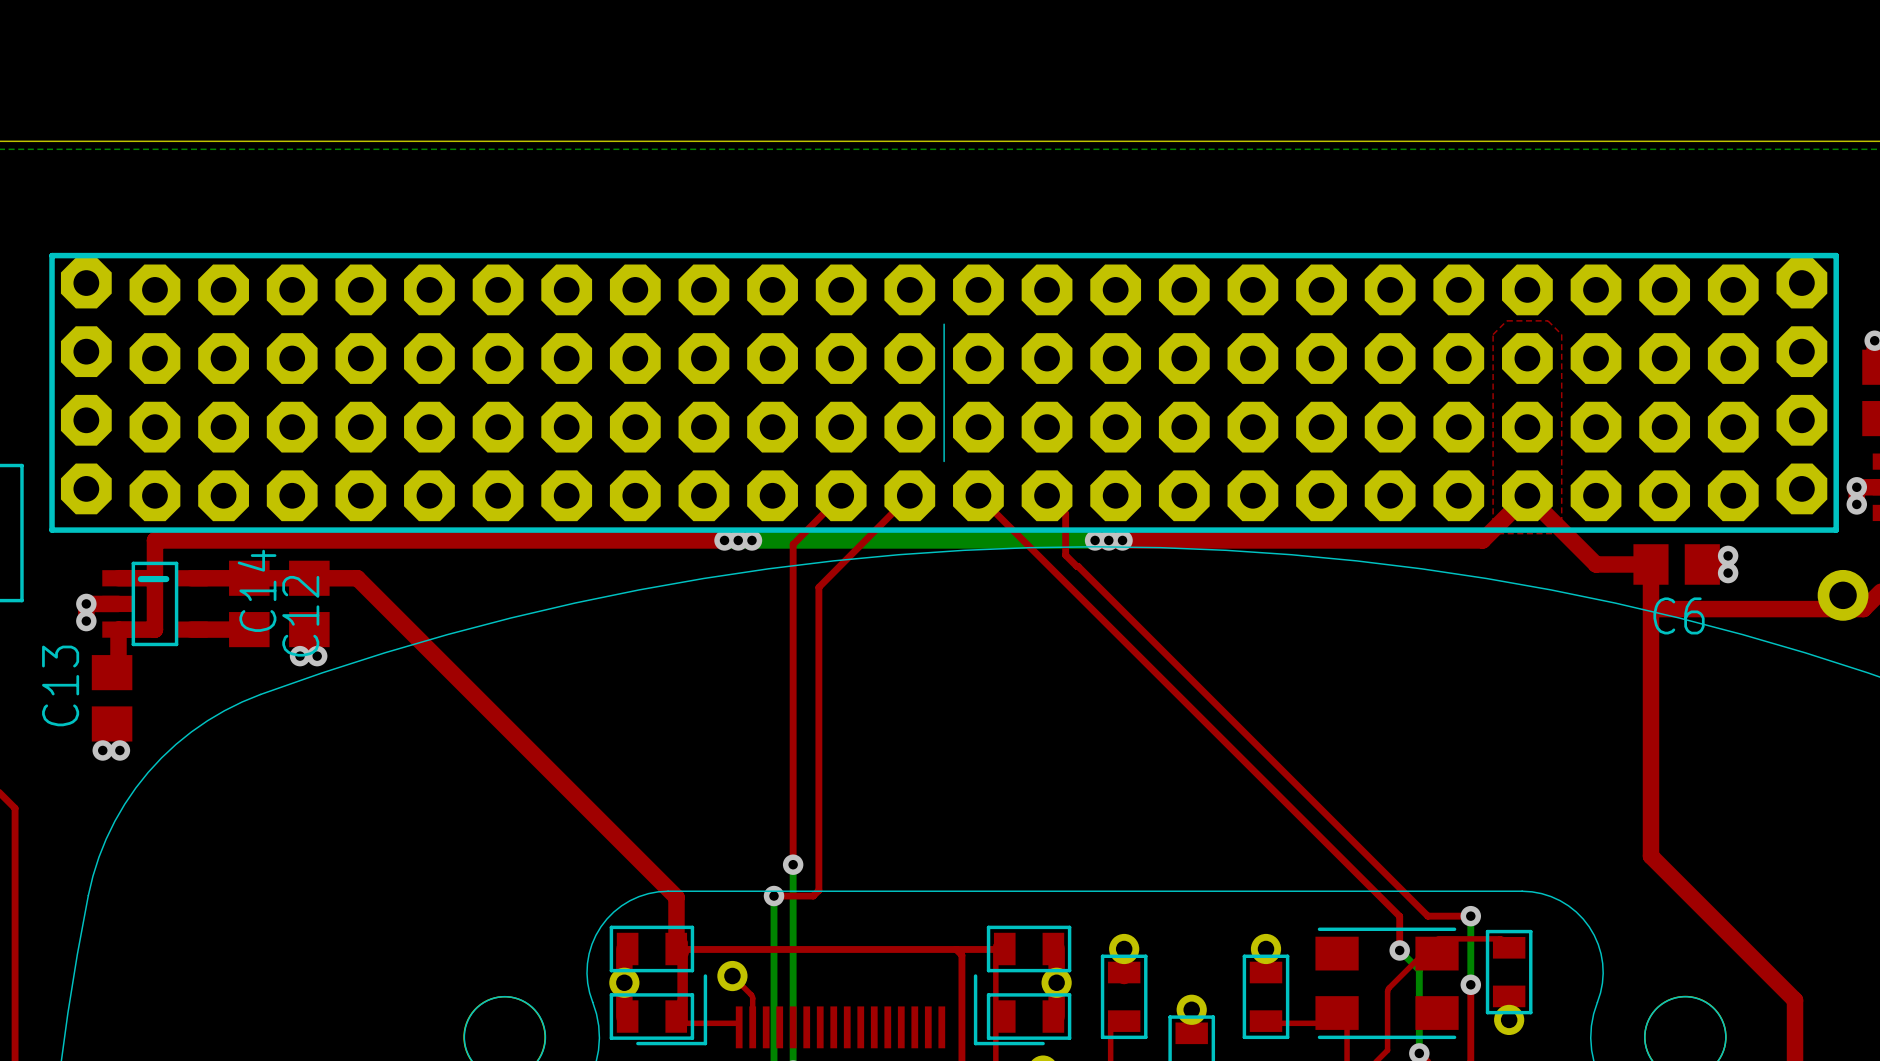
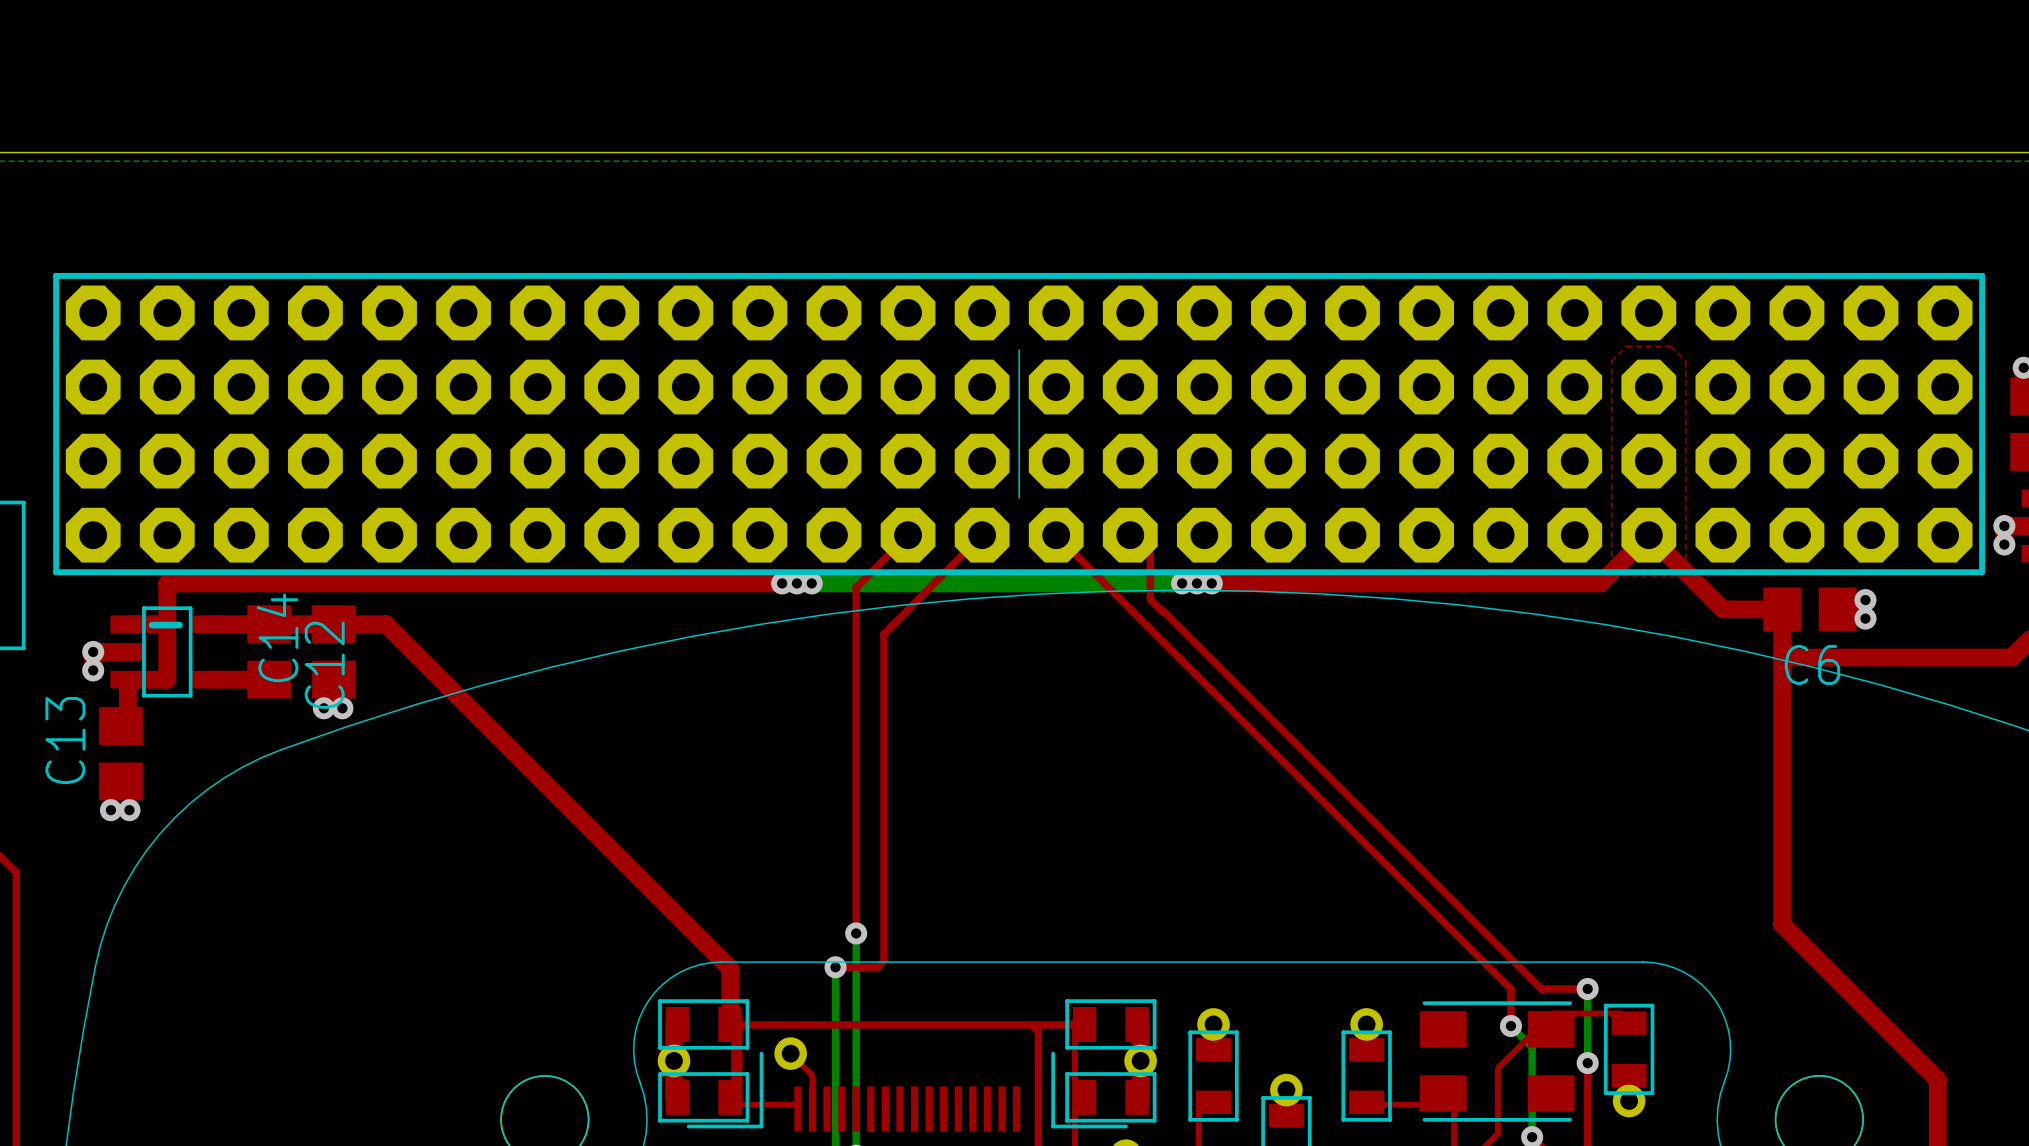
part footprint: [49, 252, 1839, 533] -> [53, 272, 1986, 576]
part: (1843, 595) -> none

